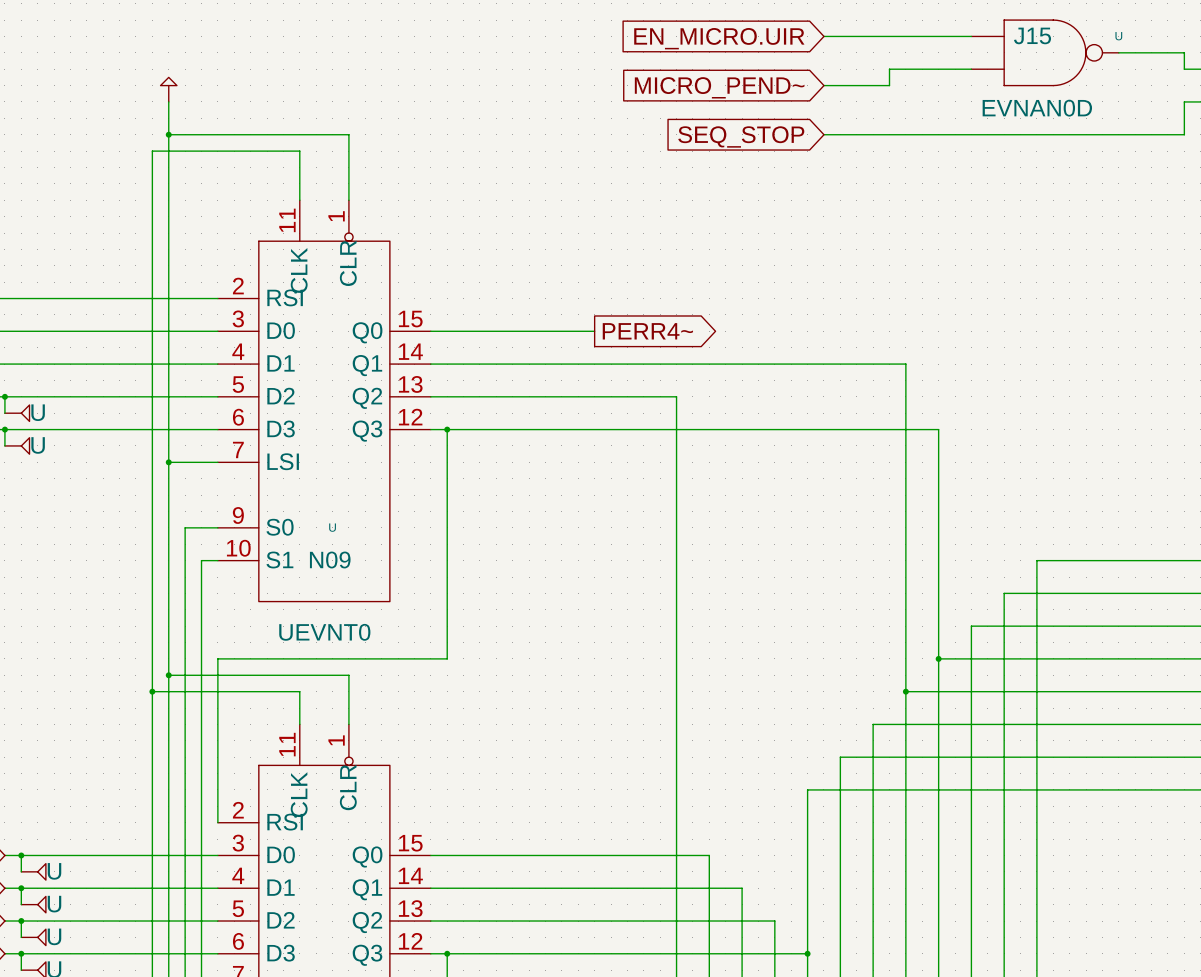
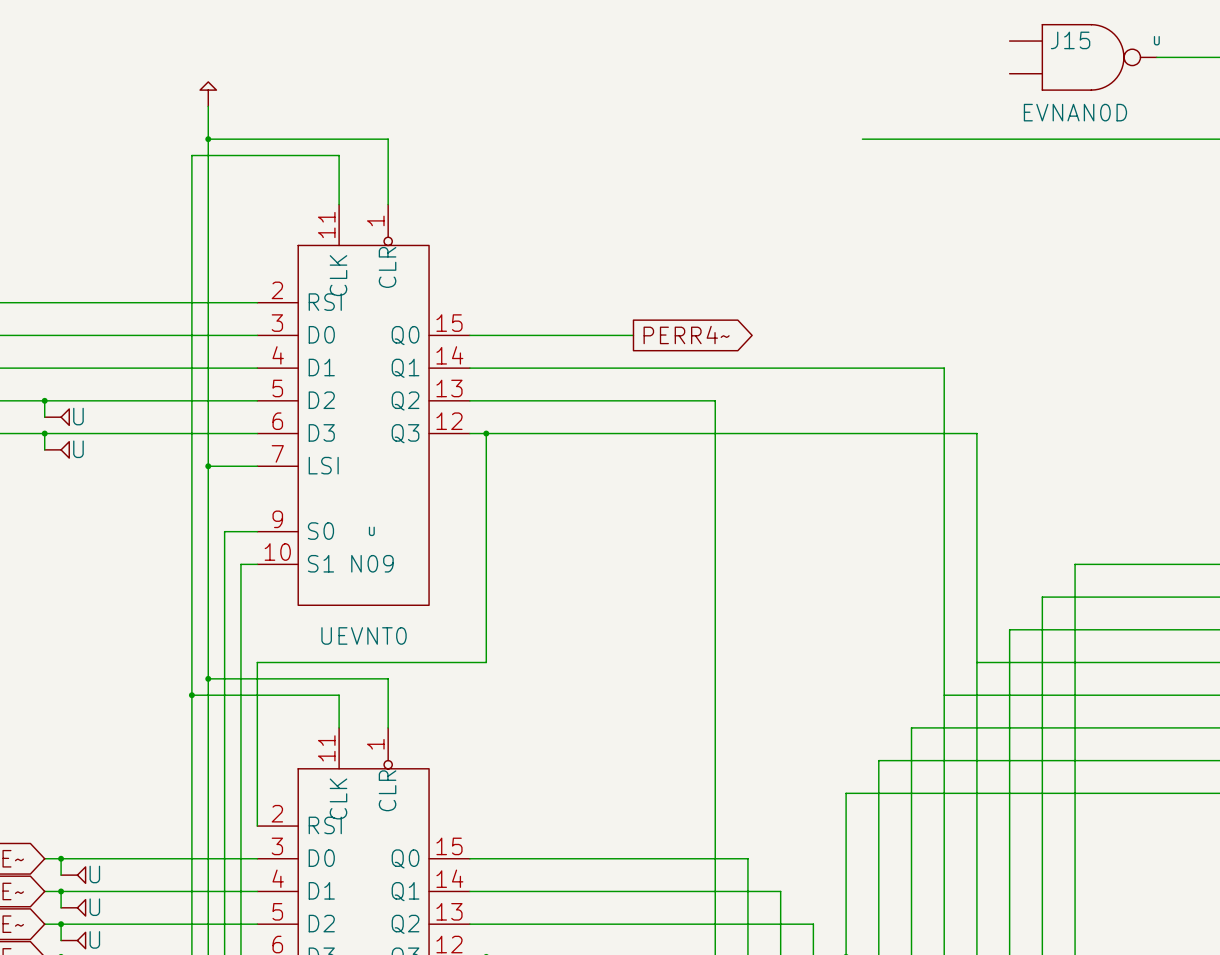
wire: (823, 36) (971, 36) -> none
global label: EN_MICRO.UIR (719, 38) -> none
wire: (971, 69) (889, 69) (889, 85) (823, 85) -> none
global label: MICRO_PEND~ (719, 87) -> none
global label: SEQ_STOP (741, 136) -> none
junction: (938, 658) -> none
junction: (905, 691) -> none

